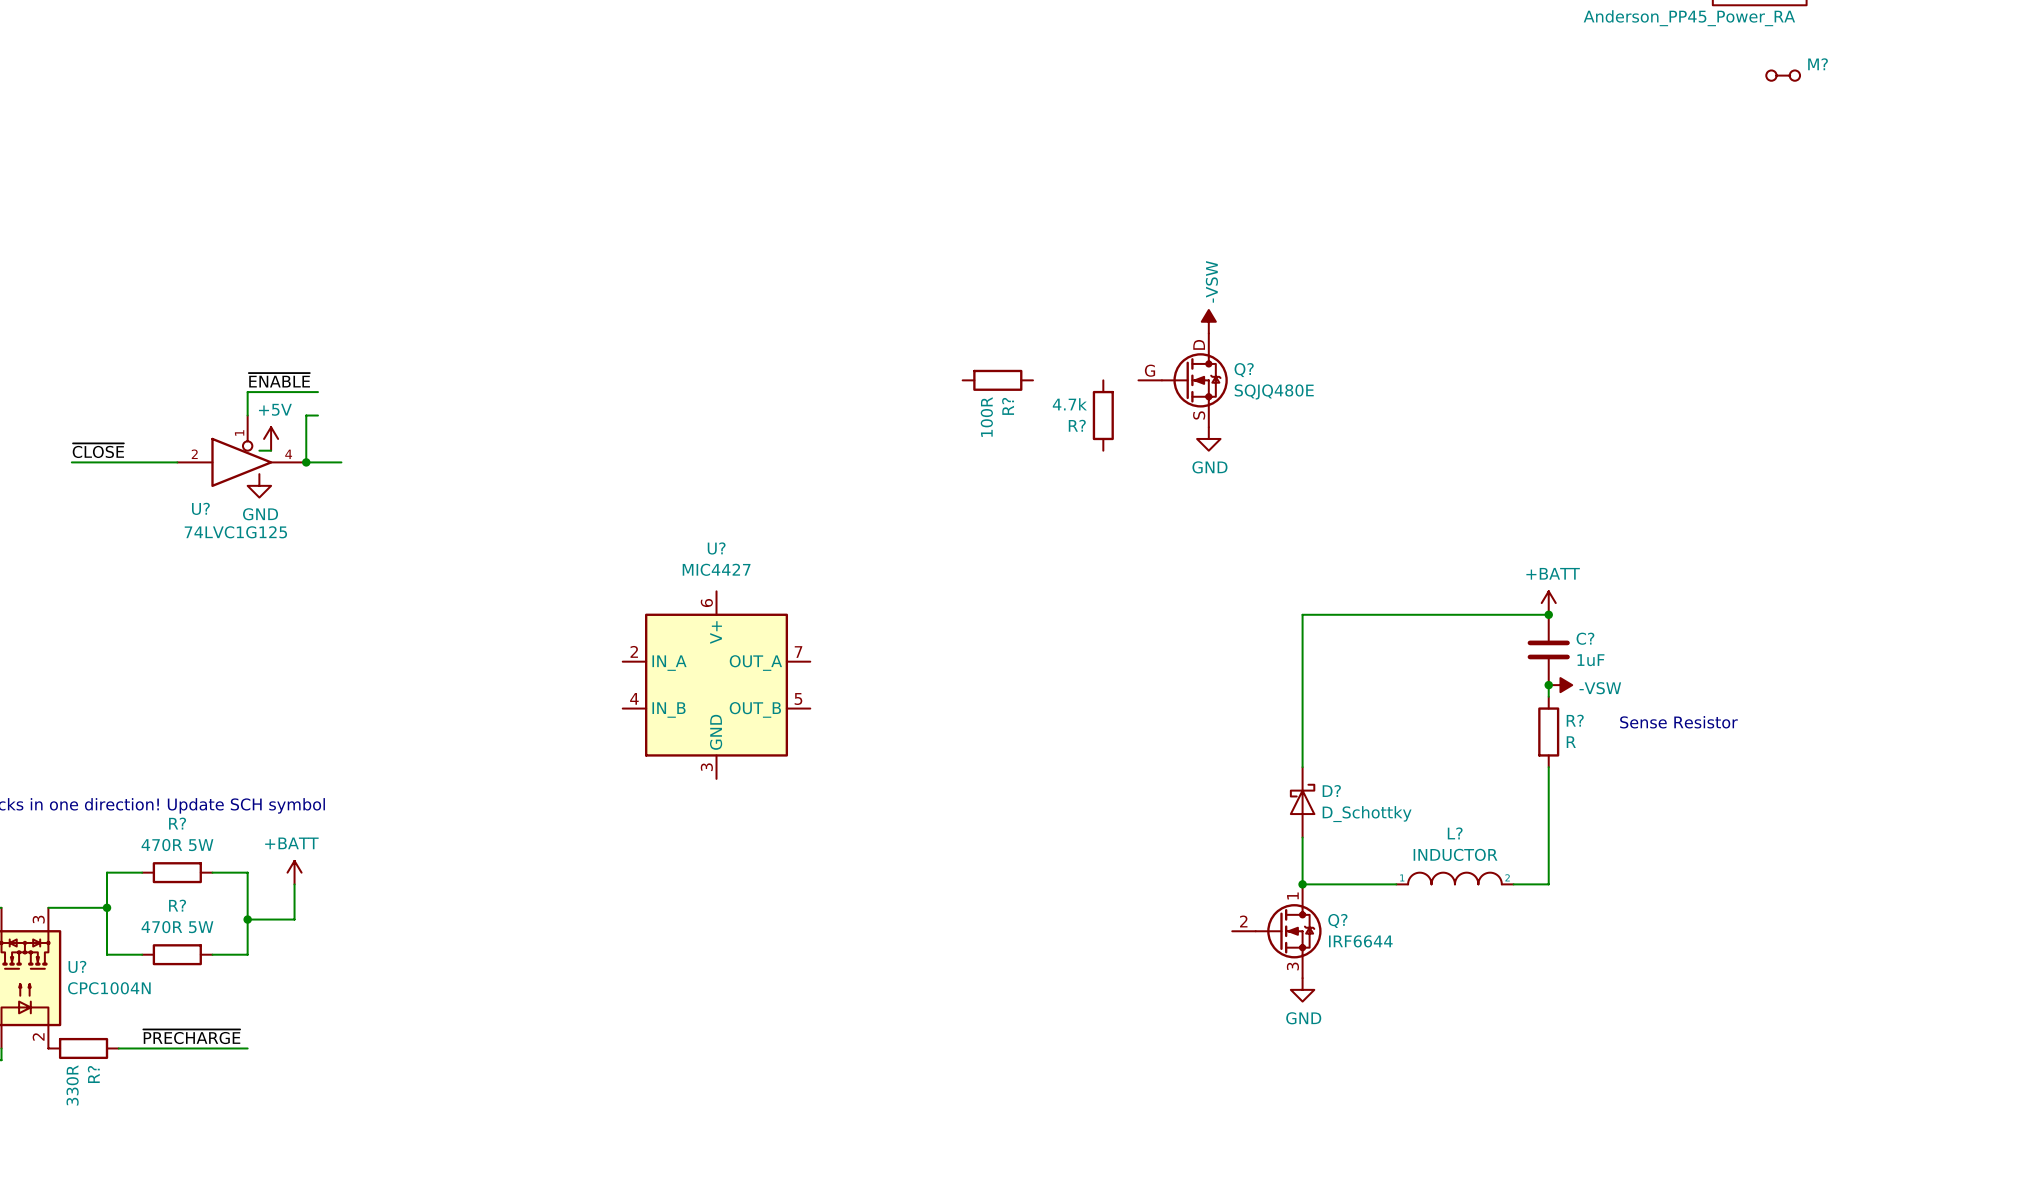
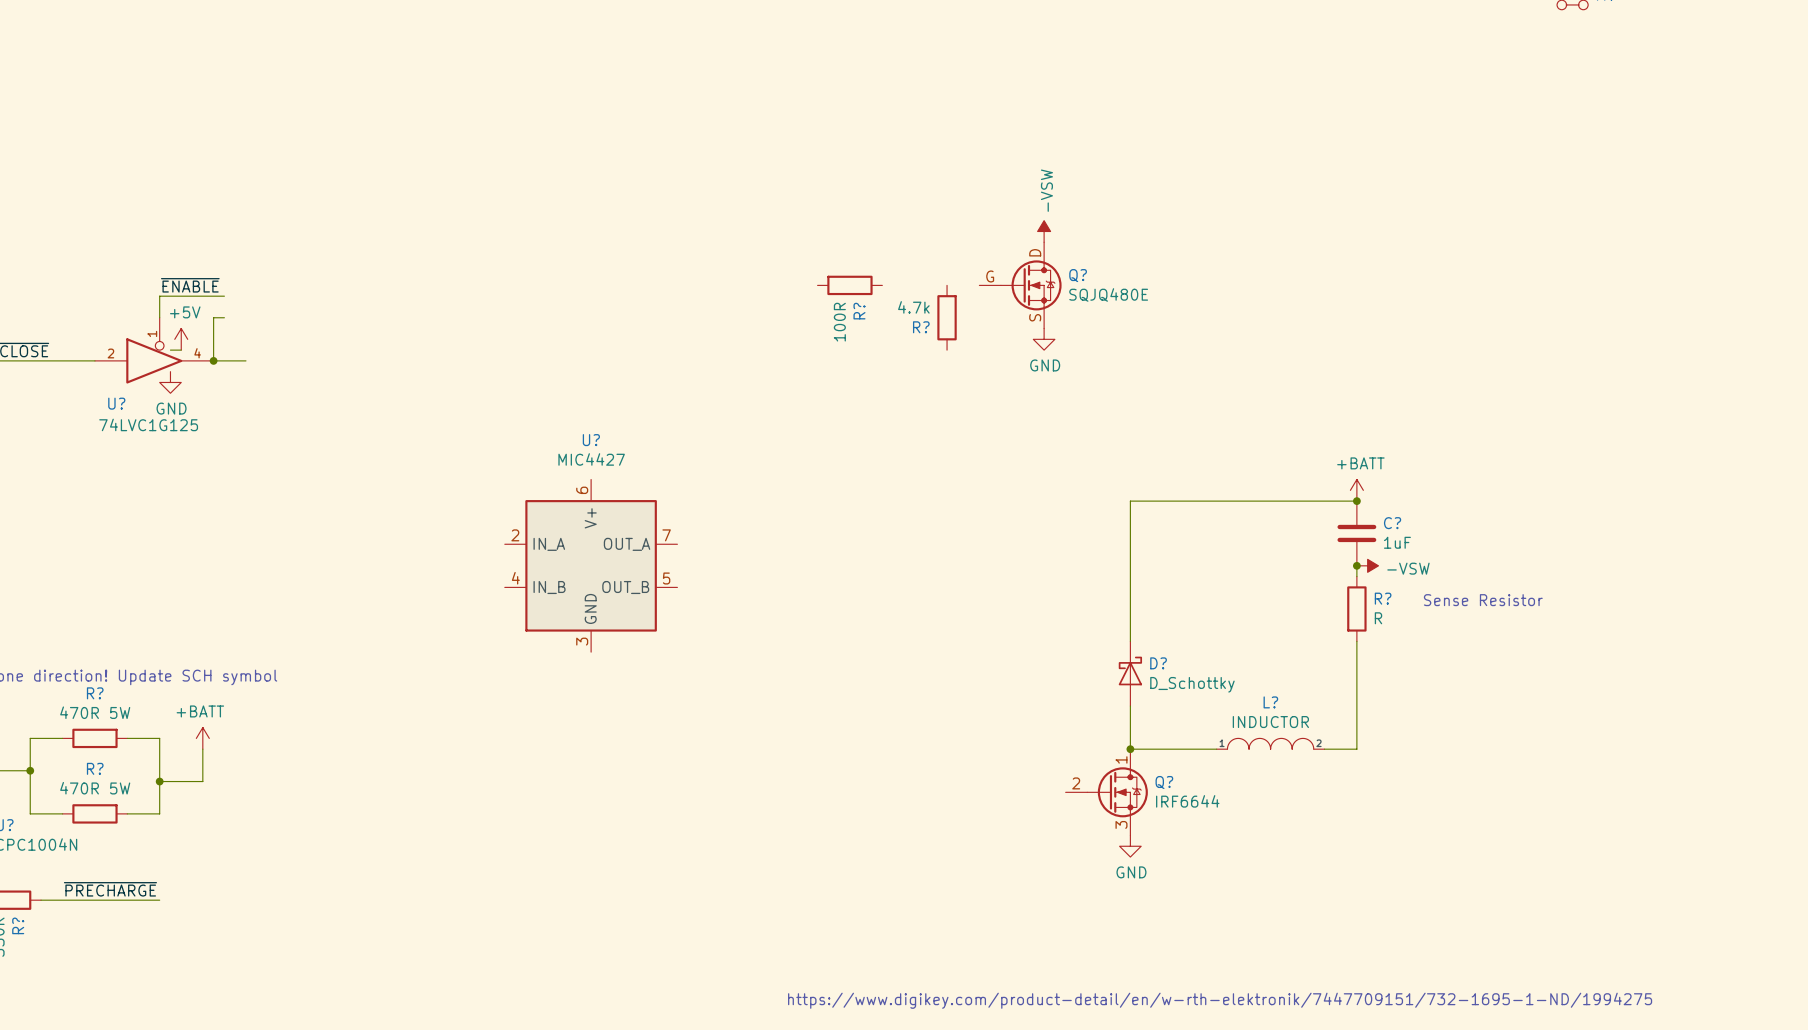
text: none -> https://www.digikey.com/product-detail/en/w-rth-elektronik/7447709151/732-1695-1-ND/1994275 (1220, 1000)

